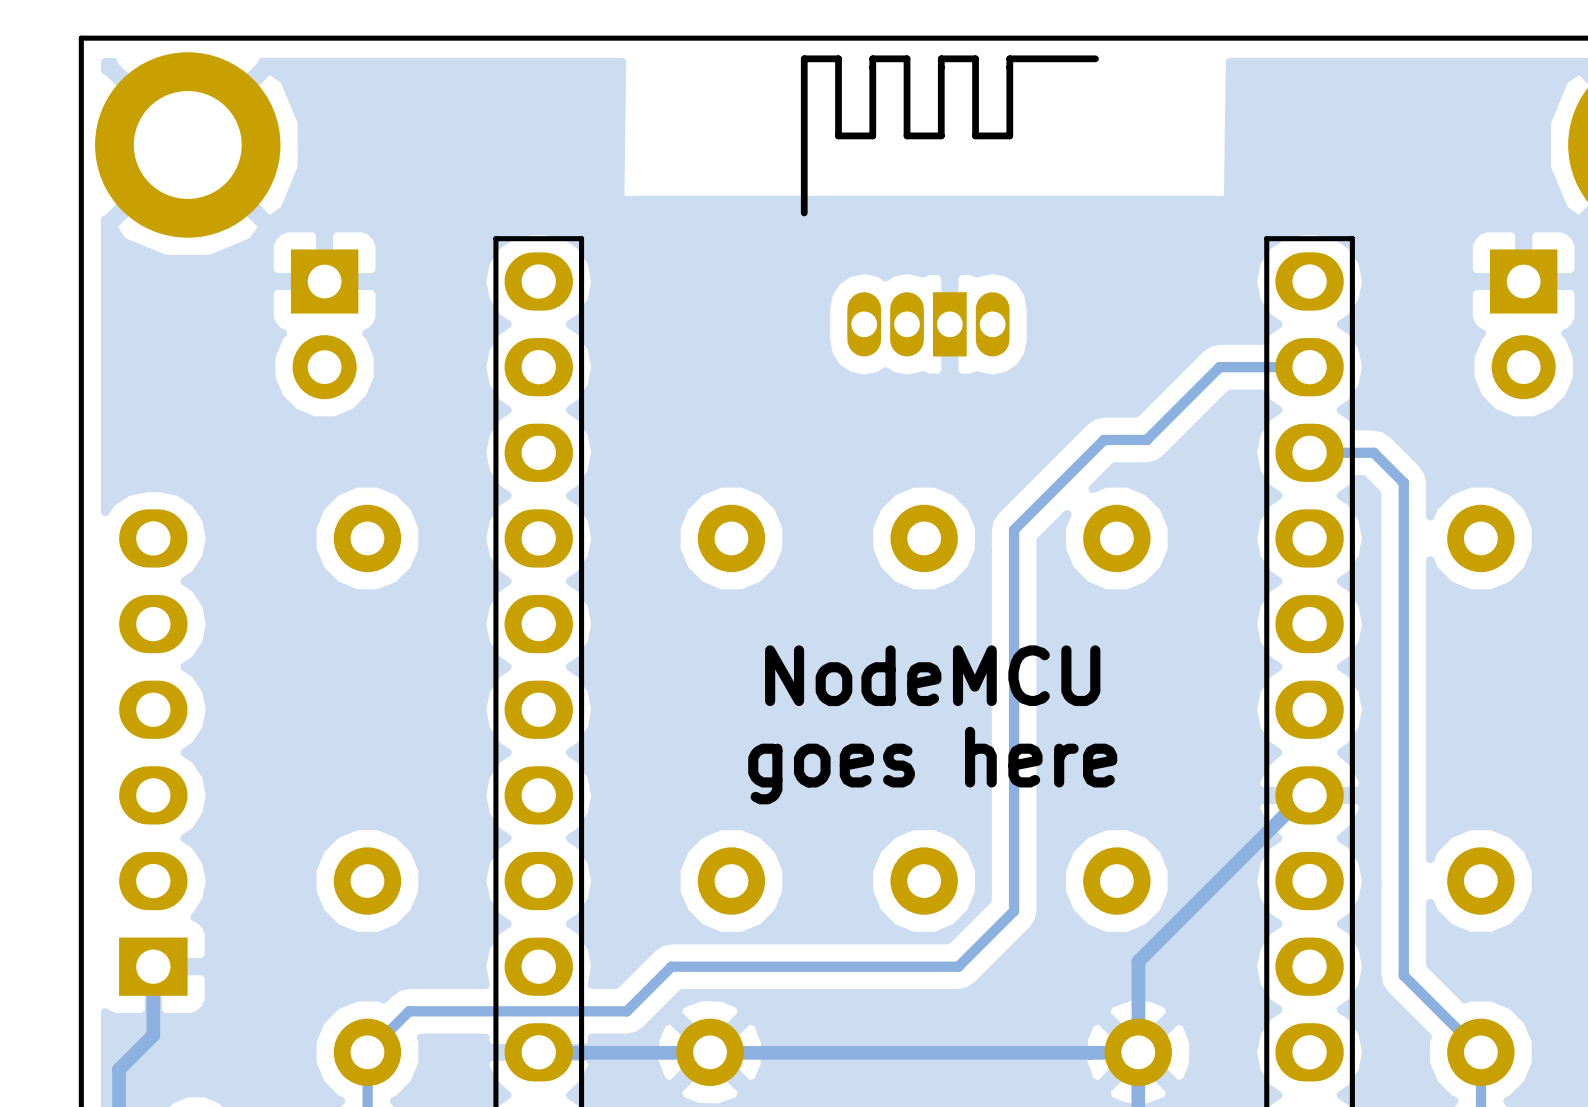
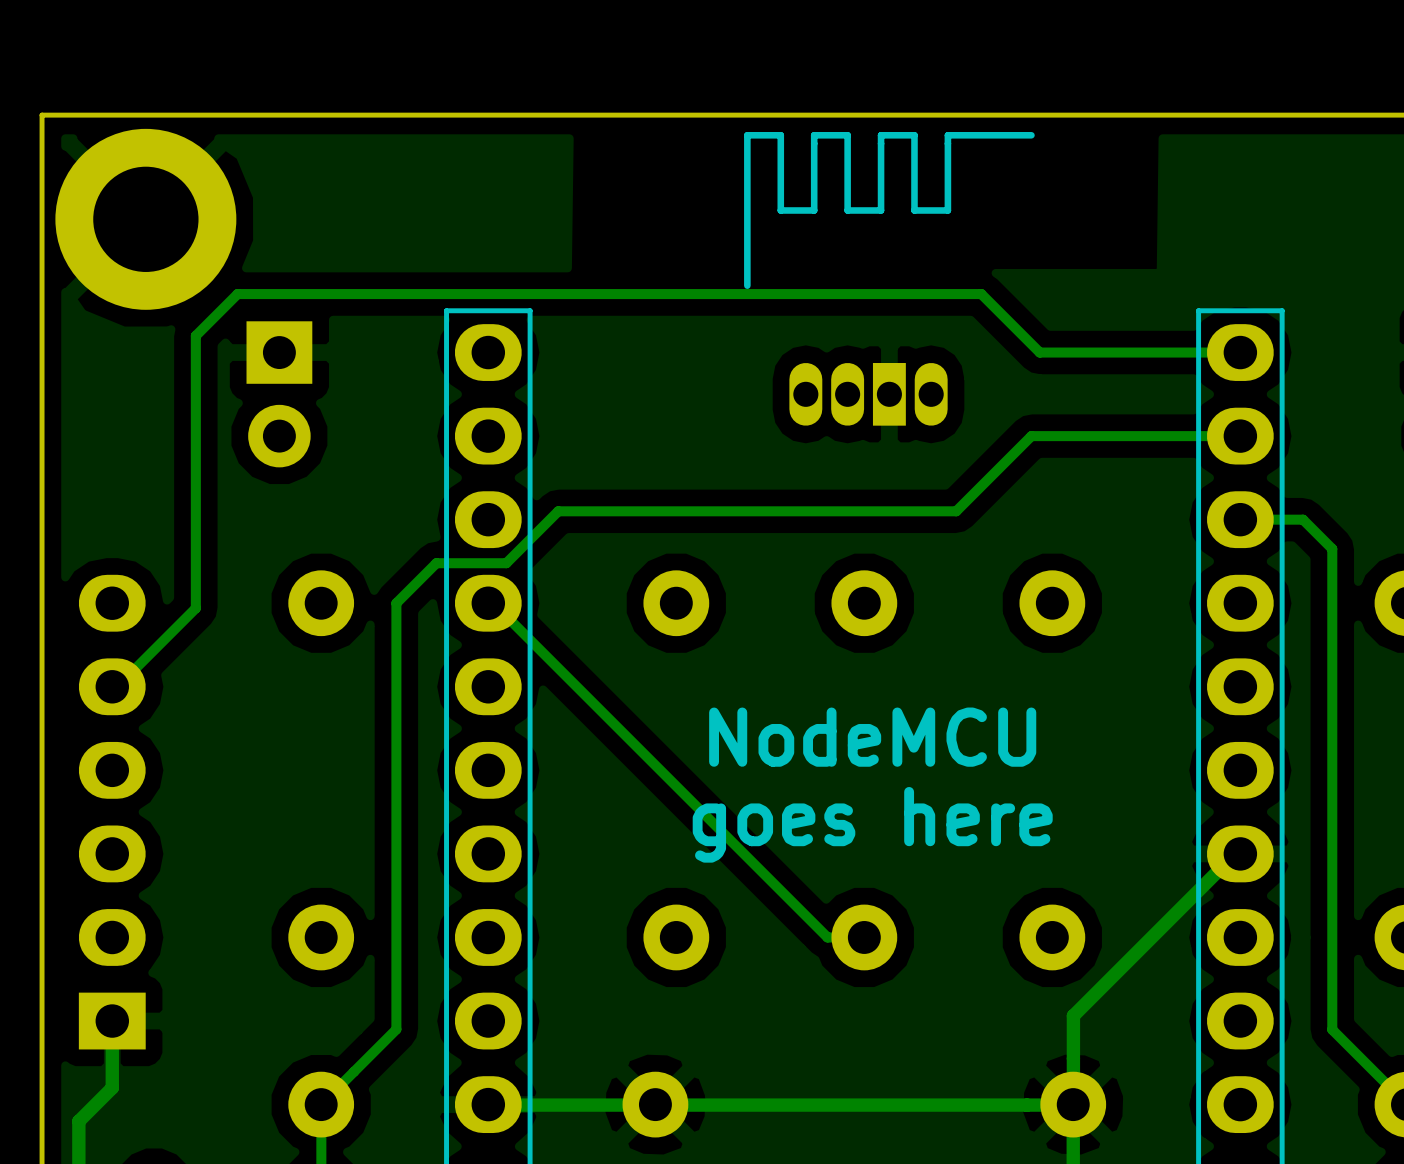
track: none -> (1240, 352) (1039, 352) (981, 294) (237, 294) (195, 335) (195, 608) (117, 686) (112, 686)
track: (1219, 367) (1146, 439) (1104, 439) (1014, 529) (1014, 911) (958, 966) (671, 966) (626, 1011) (409, 1011) (367, 1052) -> (1152, 436) (1031, 436) (956, 511) (558, 511) (506, 563) (436, 563) (396, 603) (396, 1029) (321, 1104)
track: none -> (488, 603) (493, 603) (827, 937) (864, 937)

